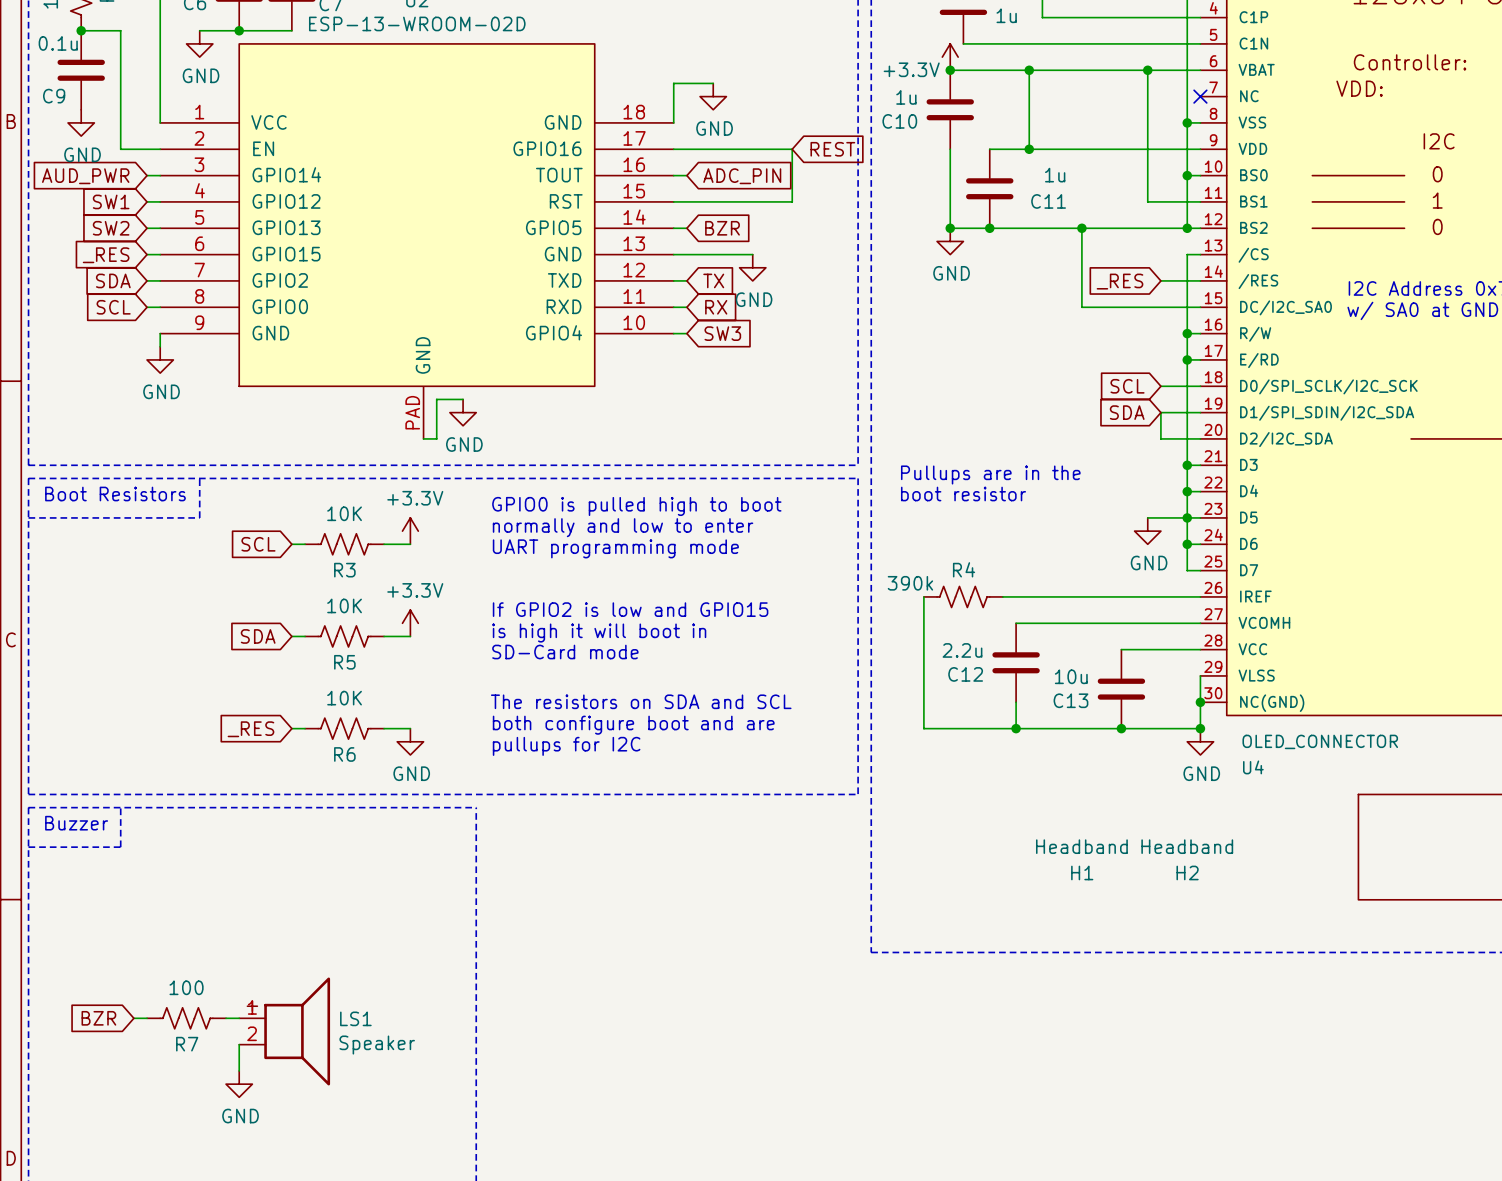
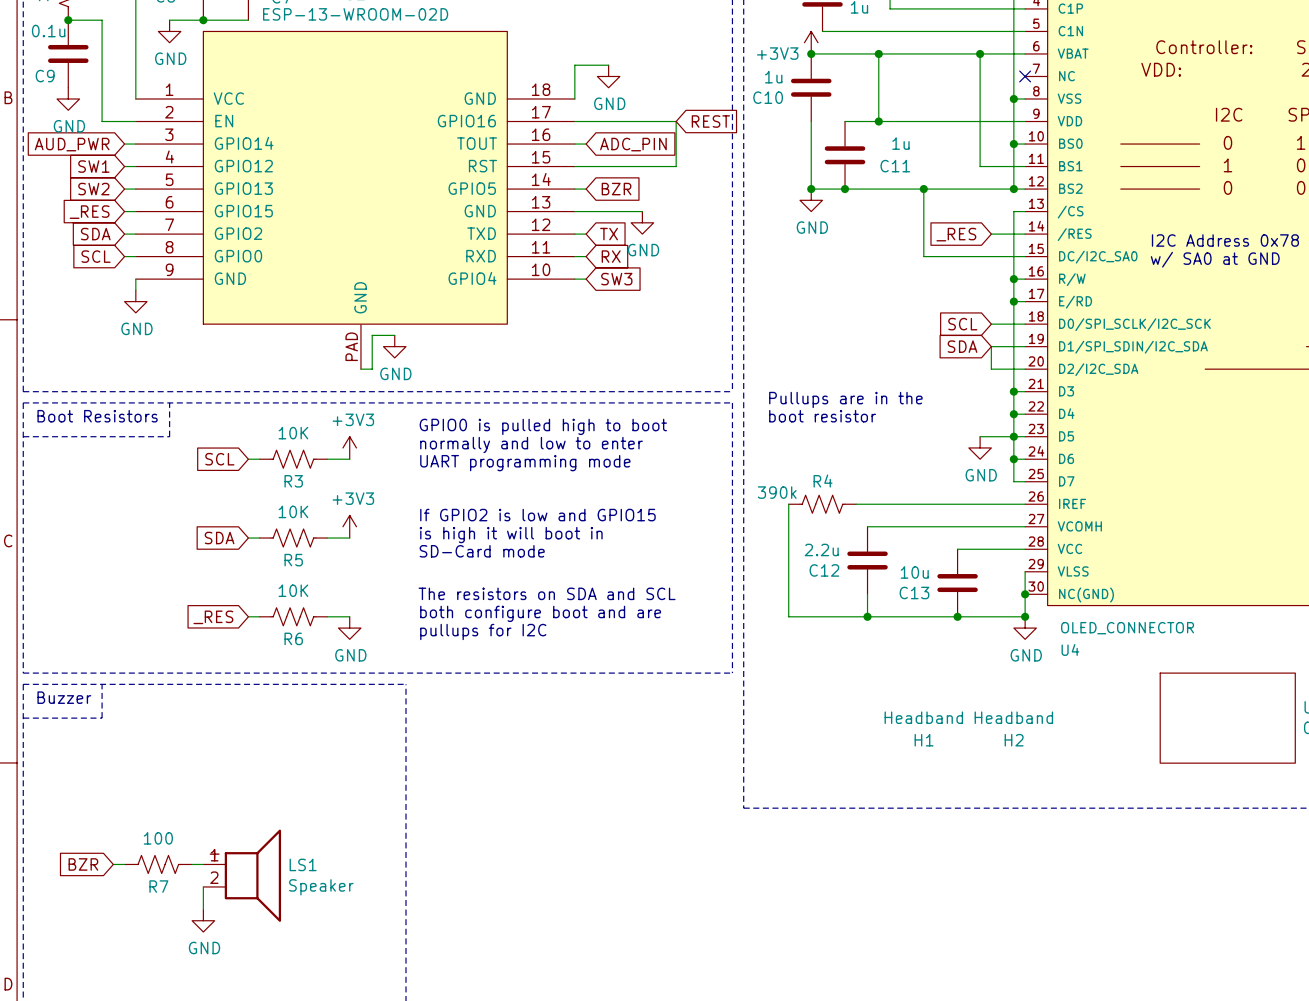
power symbol: +3.3V (950, 57) -> +3V3 (811, 42)
power symbol: +3.3V (410, 531) -> +3V3 (349, 447)
power symbol: +3.3V (410, 623) -> +3V3 (349, 526)

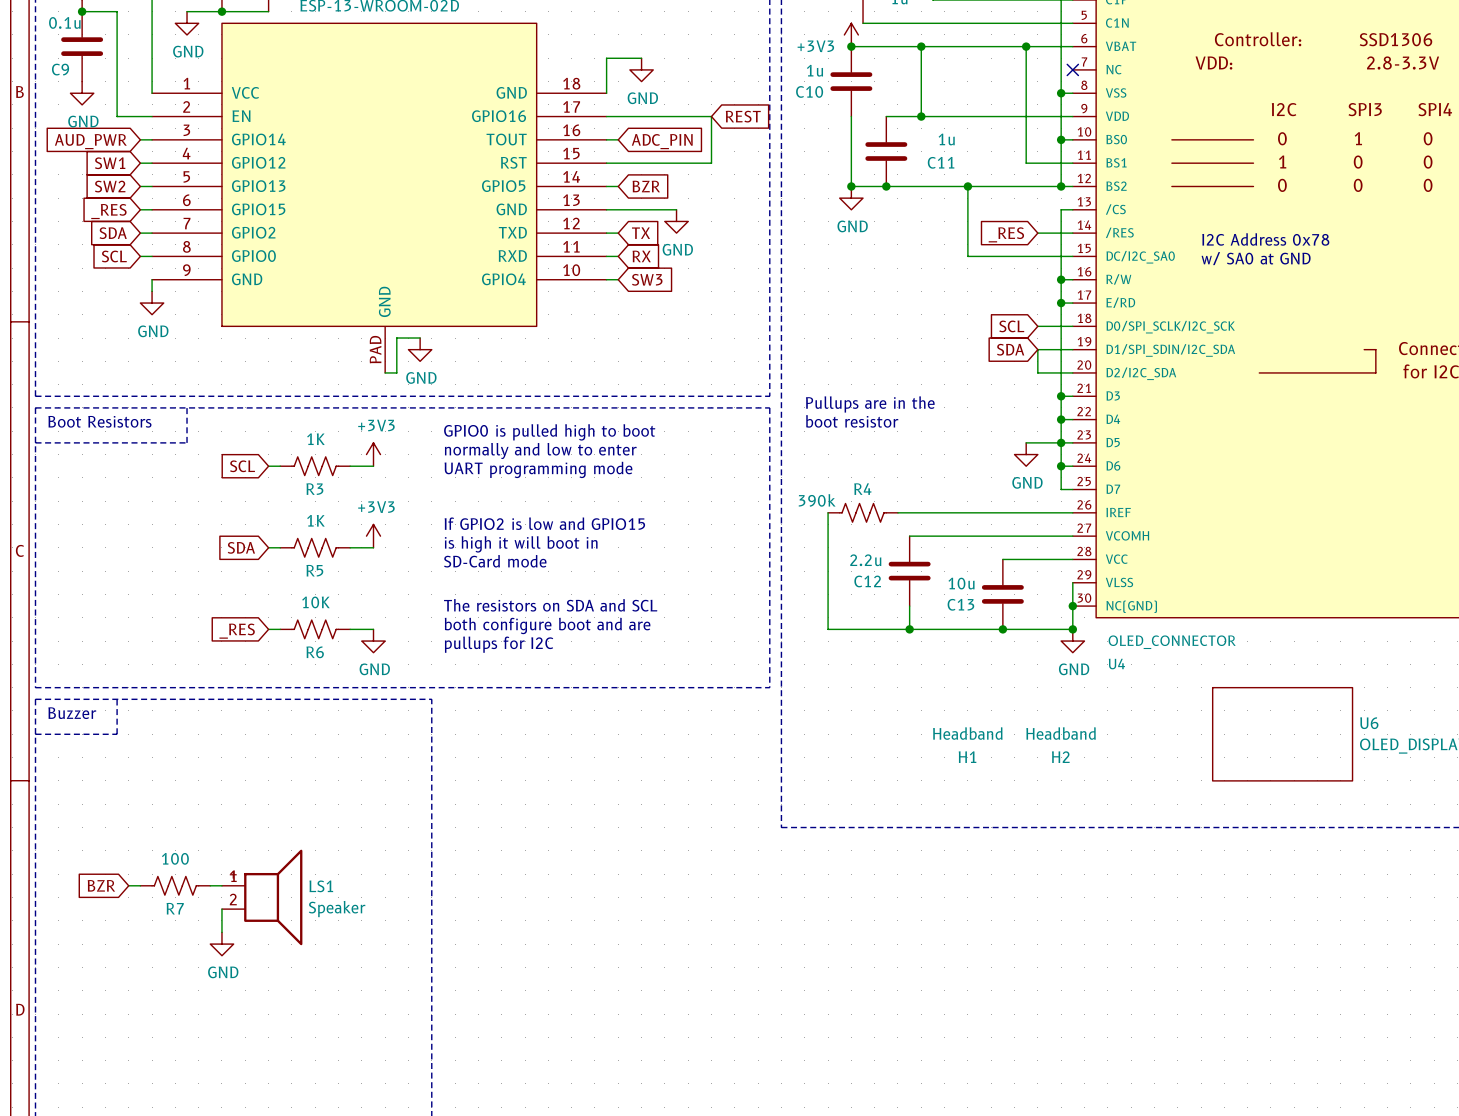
R3 value: 10K (293, 433) -> 1K (315, 439)
R5 value: 10K (293, 511) -> 1K (315, 520)

